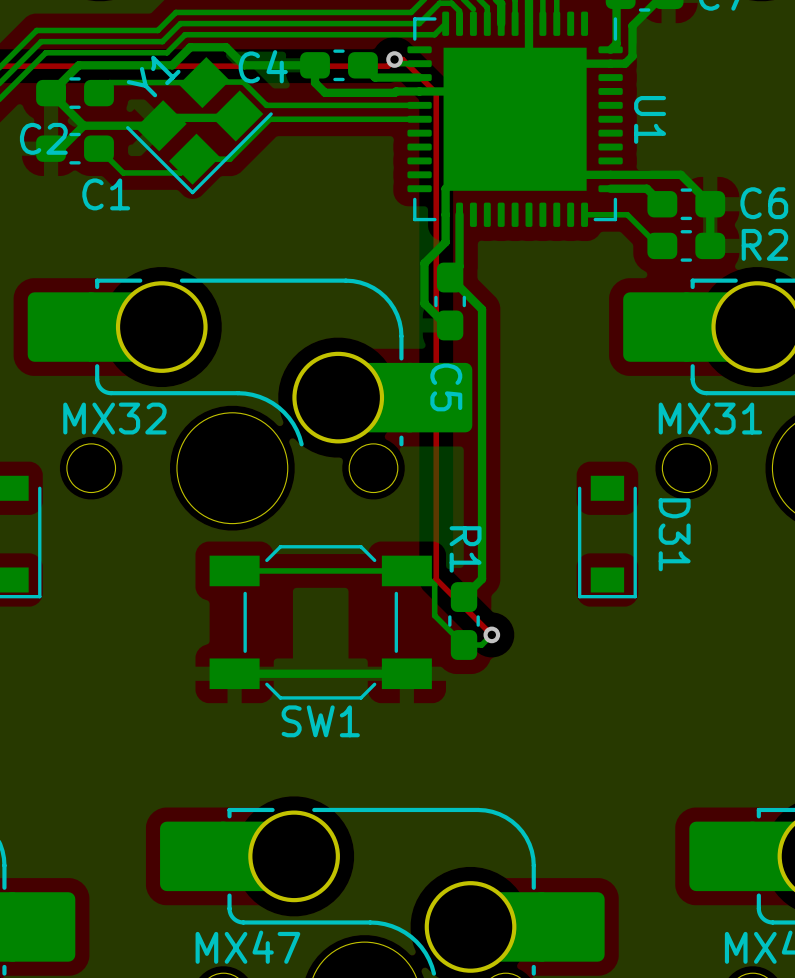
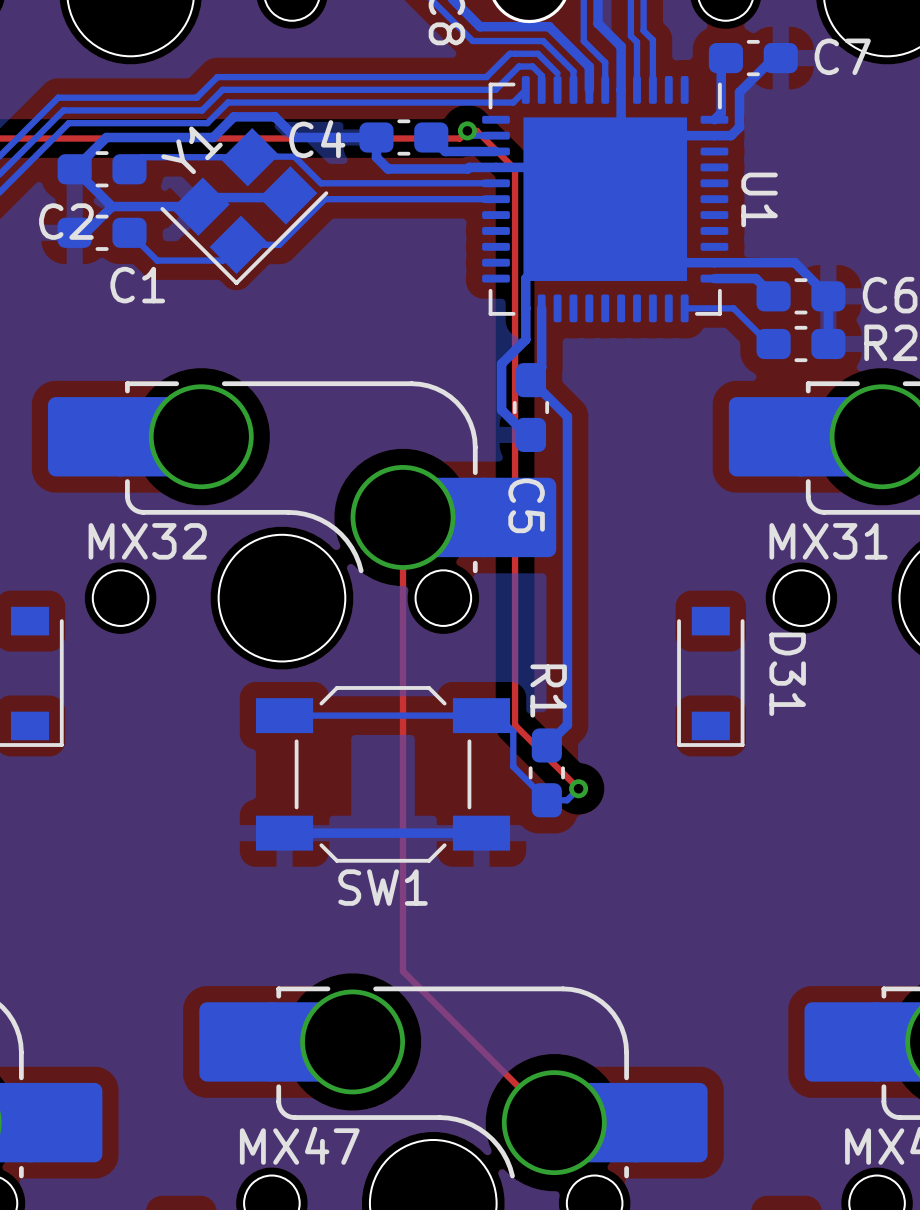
top track: none -> (403, 517) (403, 971) (554, 1122)

